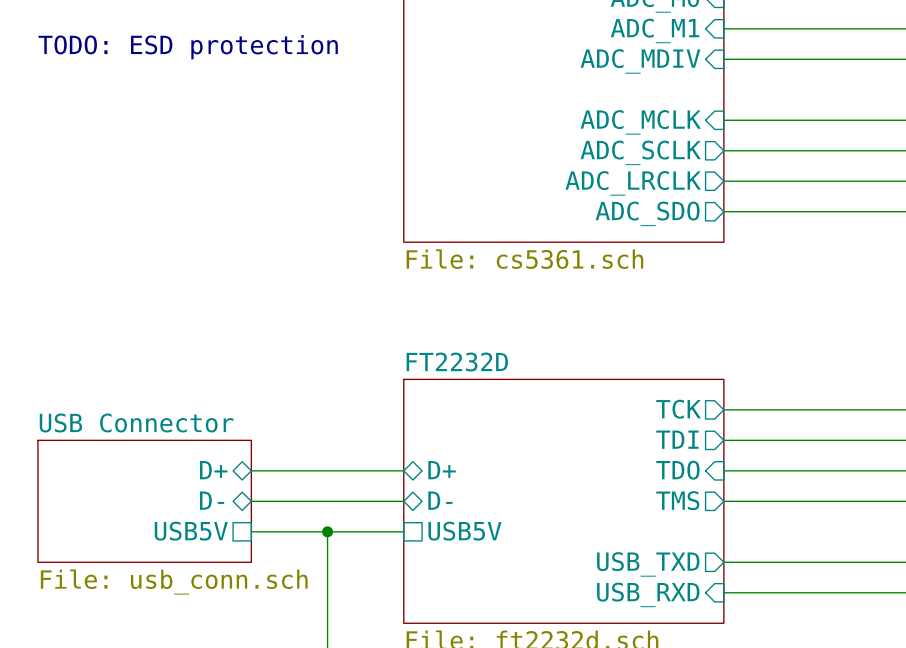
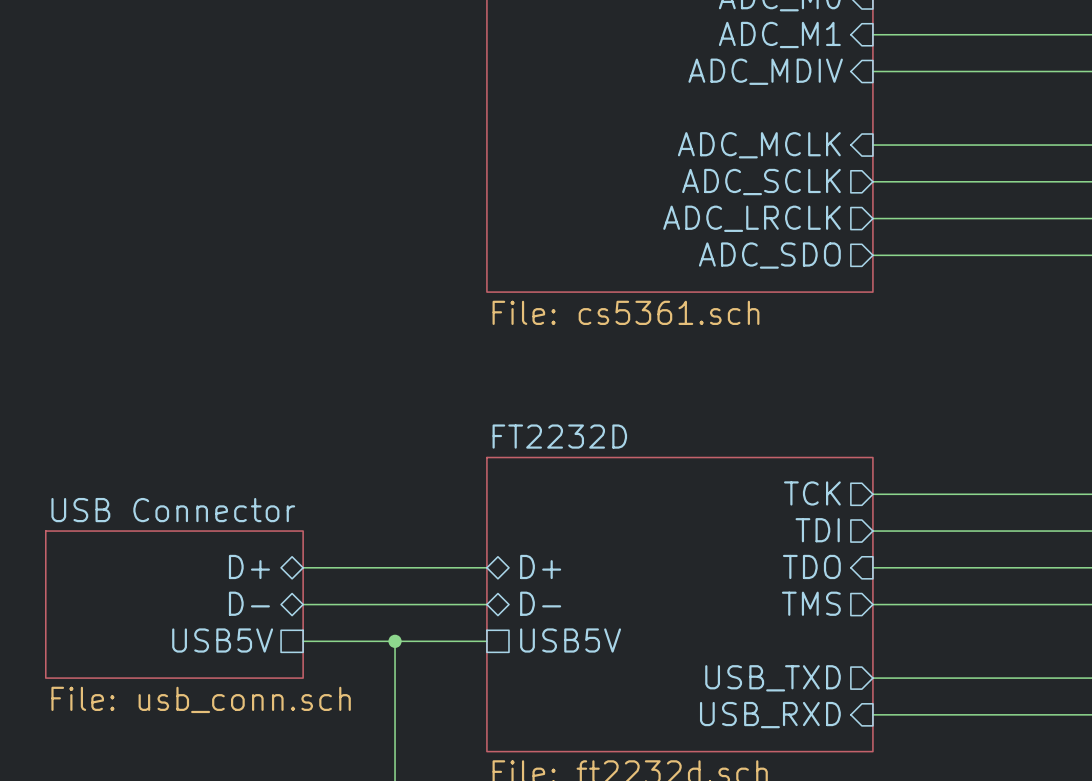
text: TODO: ESD protection (188, 47) -> none

